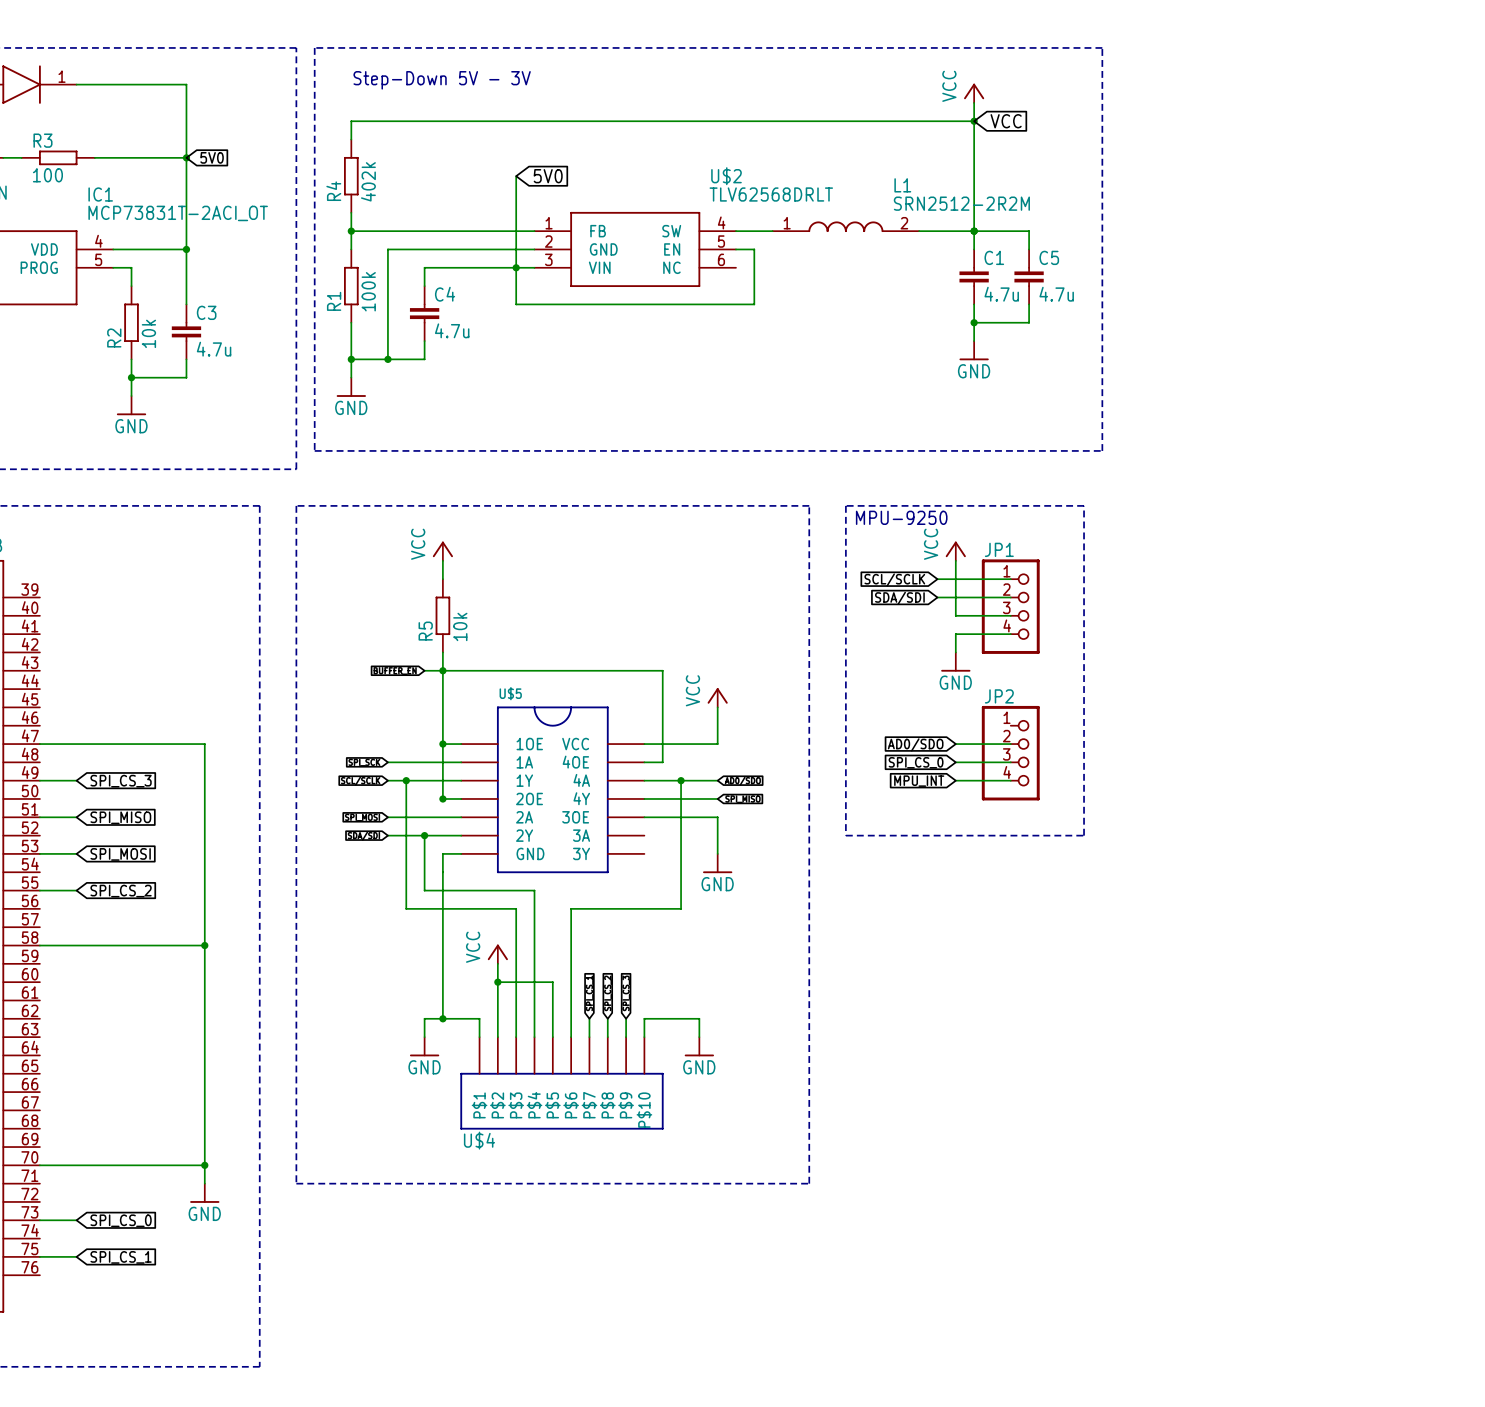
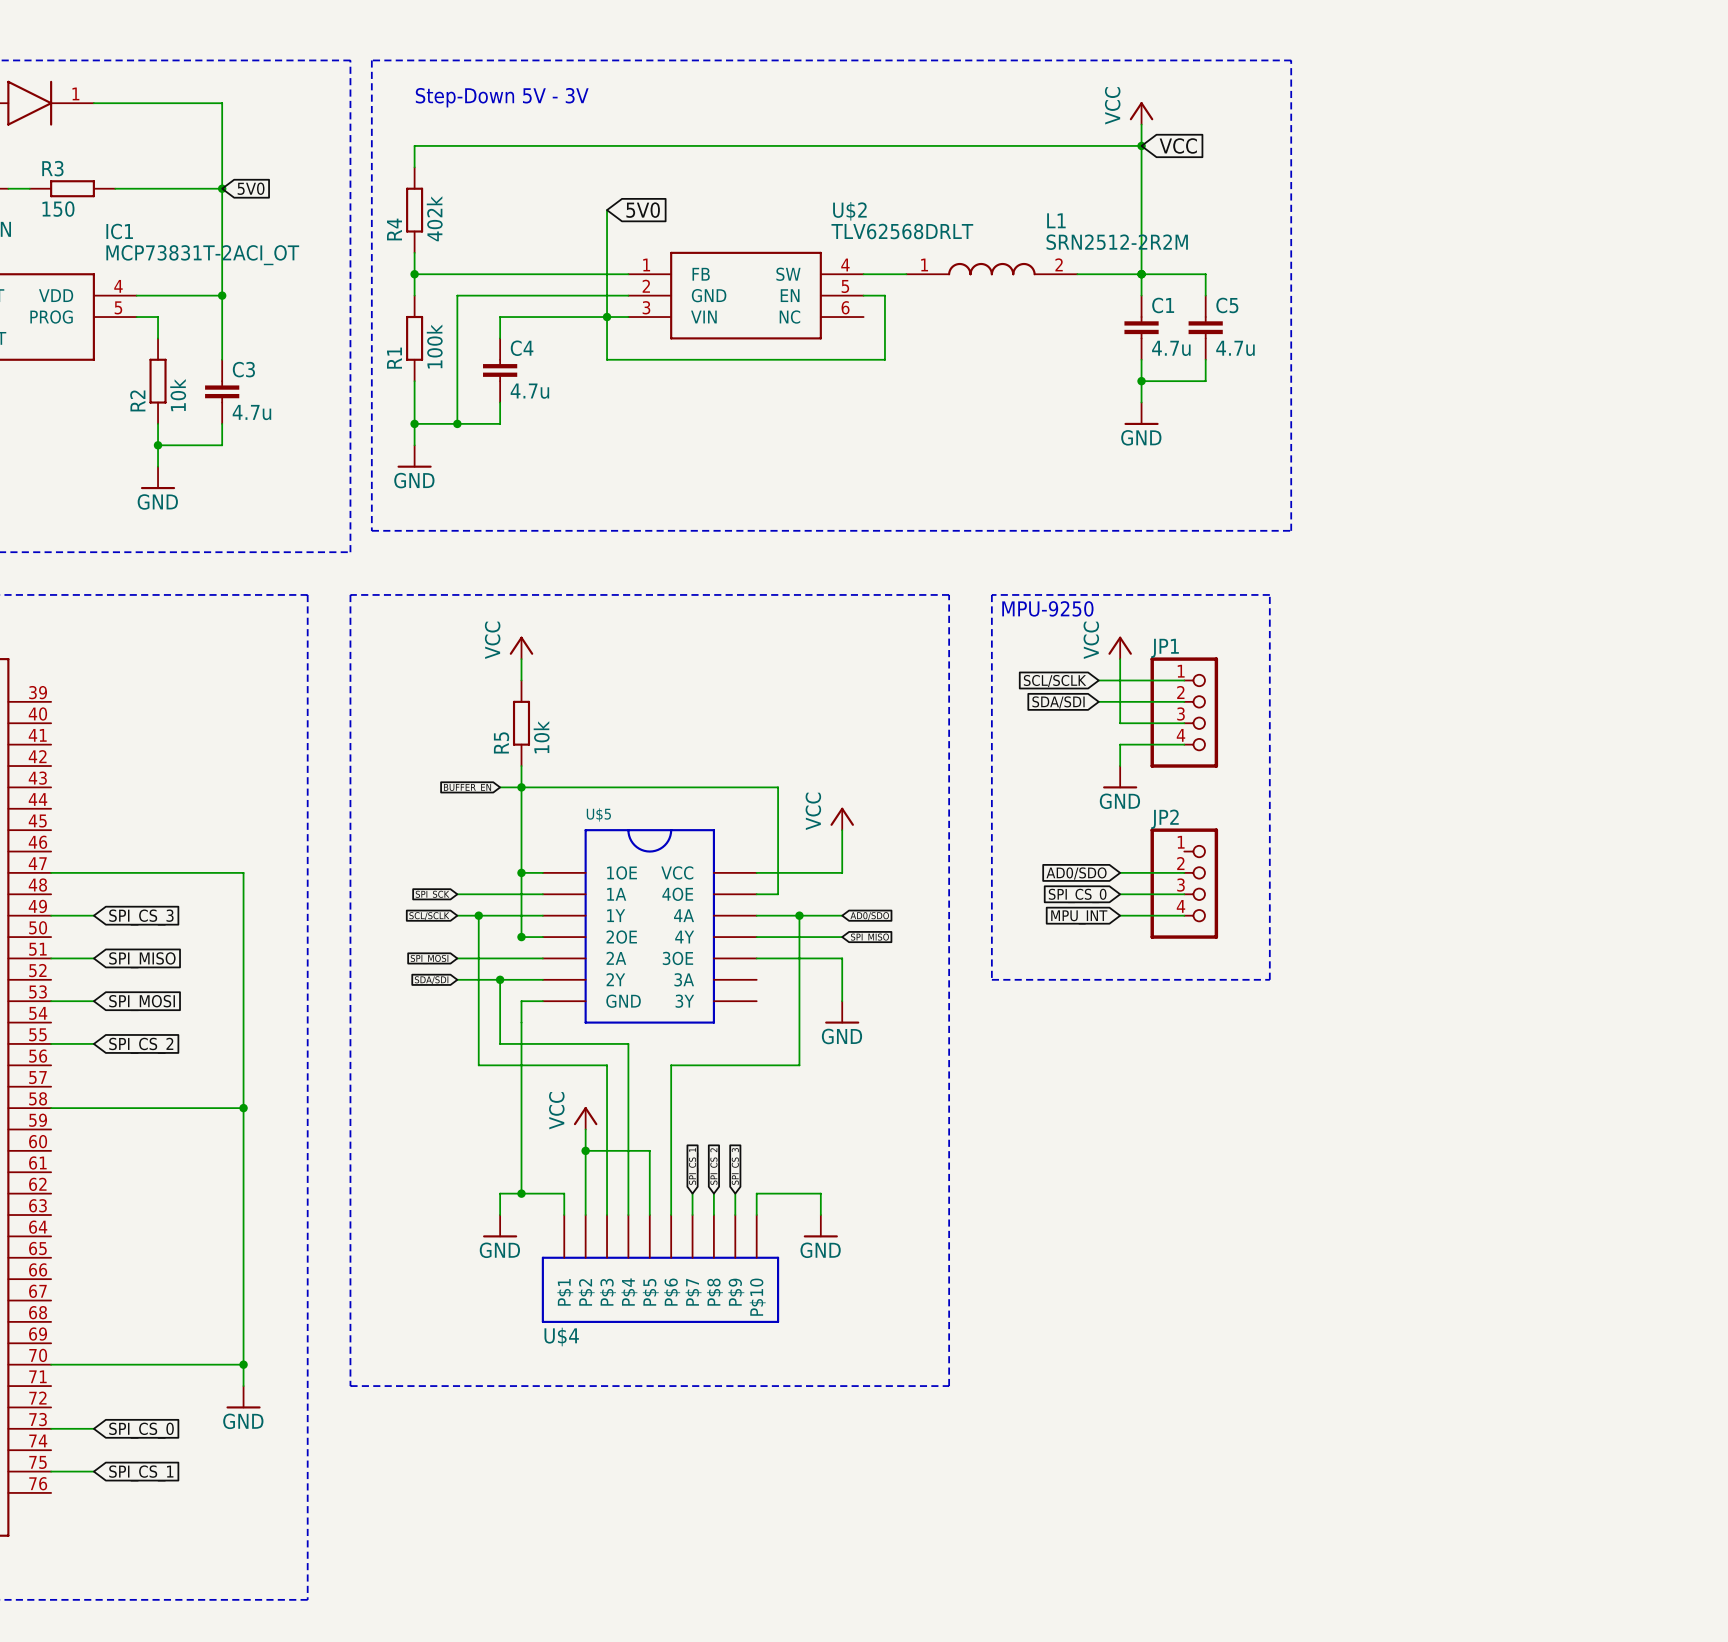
R3 value: 100 (47, 175) -> 150 (58, 209)

